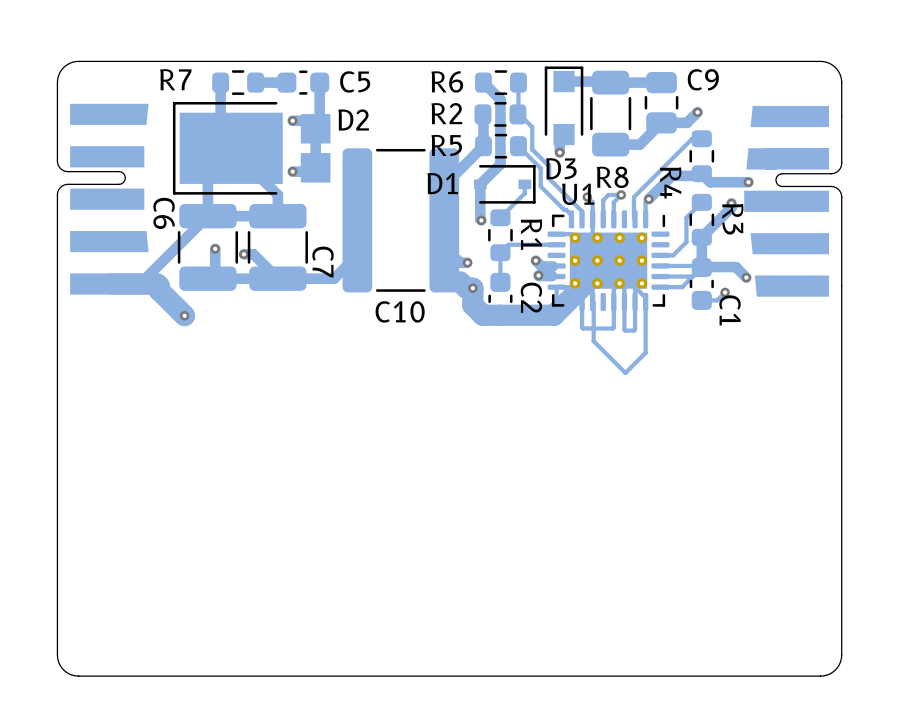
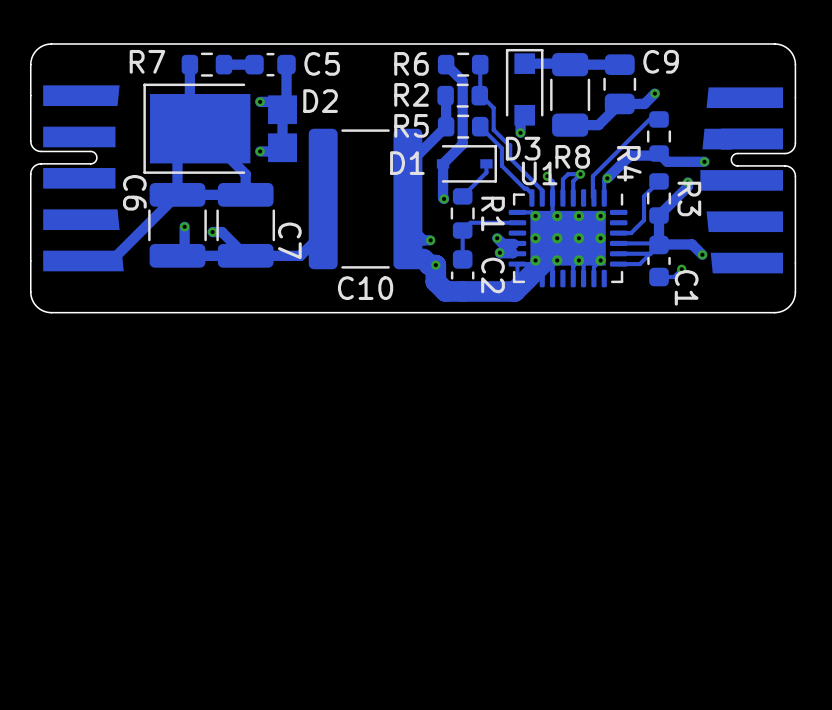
track: (608, 260) (645, 297) (645, 352) (625, 372) (593, 341) (592, 301) -> none
track: (110, 283) (157, 283) (159, 290) (184, 315) -> none
track: (613, 301) (612, 328) (583, 328) (582, 301) -> none
track: (635, 301) (633, 330) (624, 329) (624, 301) -> none
via: (184, 315) -> none
board edge: (841, 315) (841, 657) (839, 664) (833, 671) (820, 676) (78, 676) (69, 674) (60, 666) (57, 654) (57, 315) -> (795, 291) (794, 298) (789, 306) (781, 311) (774, 312) (51, 312) (42, 310) (36, 306) (32, 300) (30, 291)

